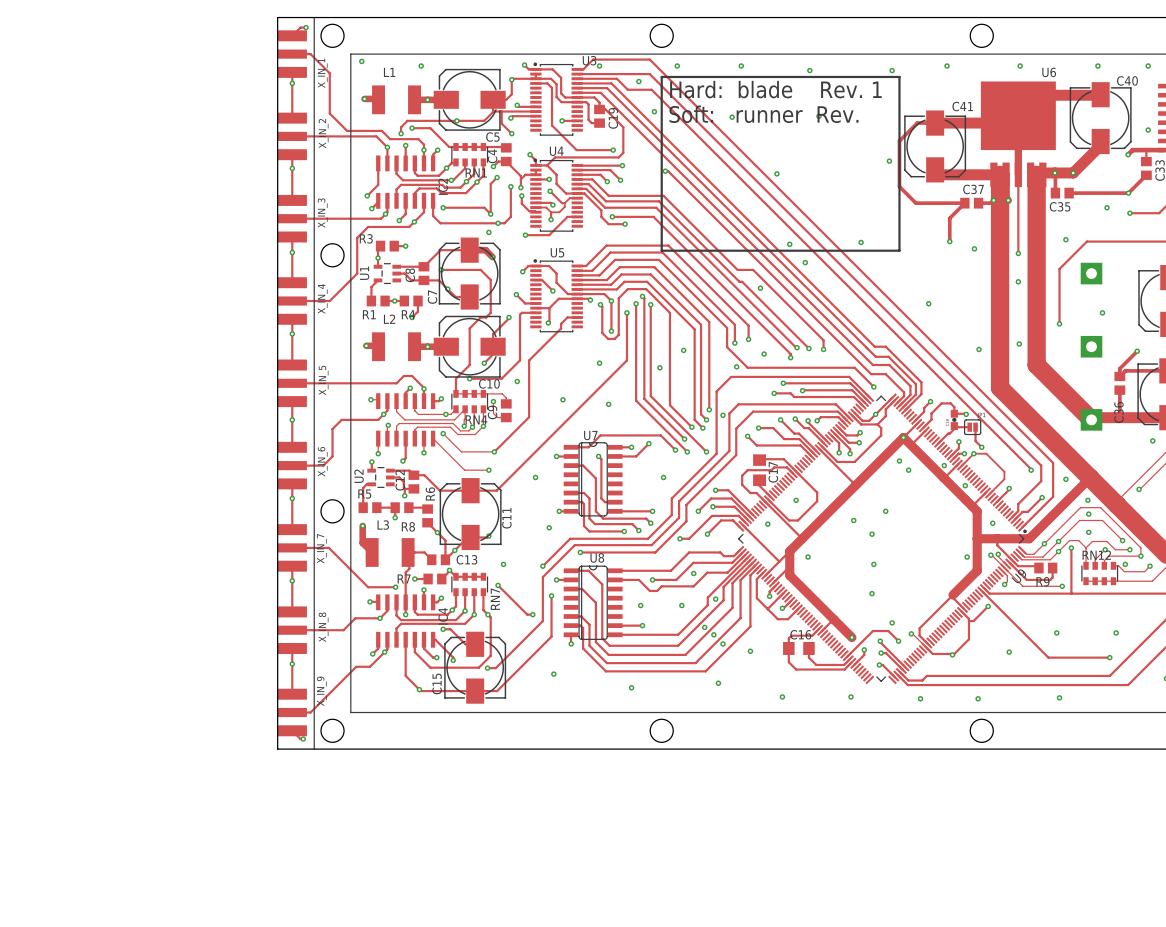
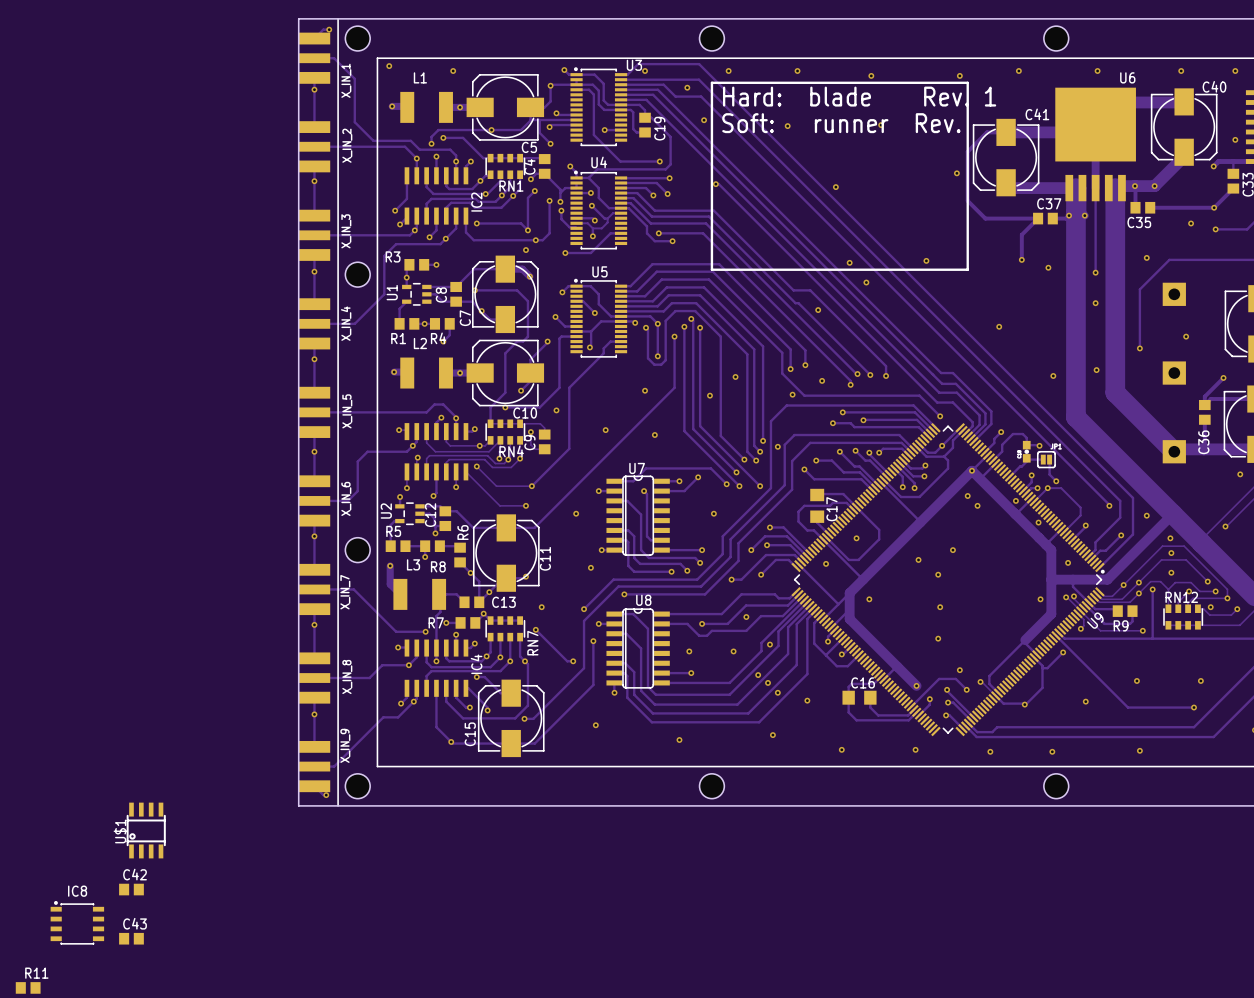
U$1: none -> (146, 830)
C42: none -> (131, 889)
IC8: none -> (77, 922)
C43: none -> (131, 938)
R11: none -> (28, 987)

